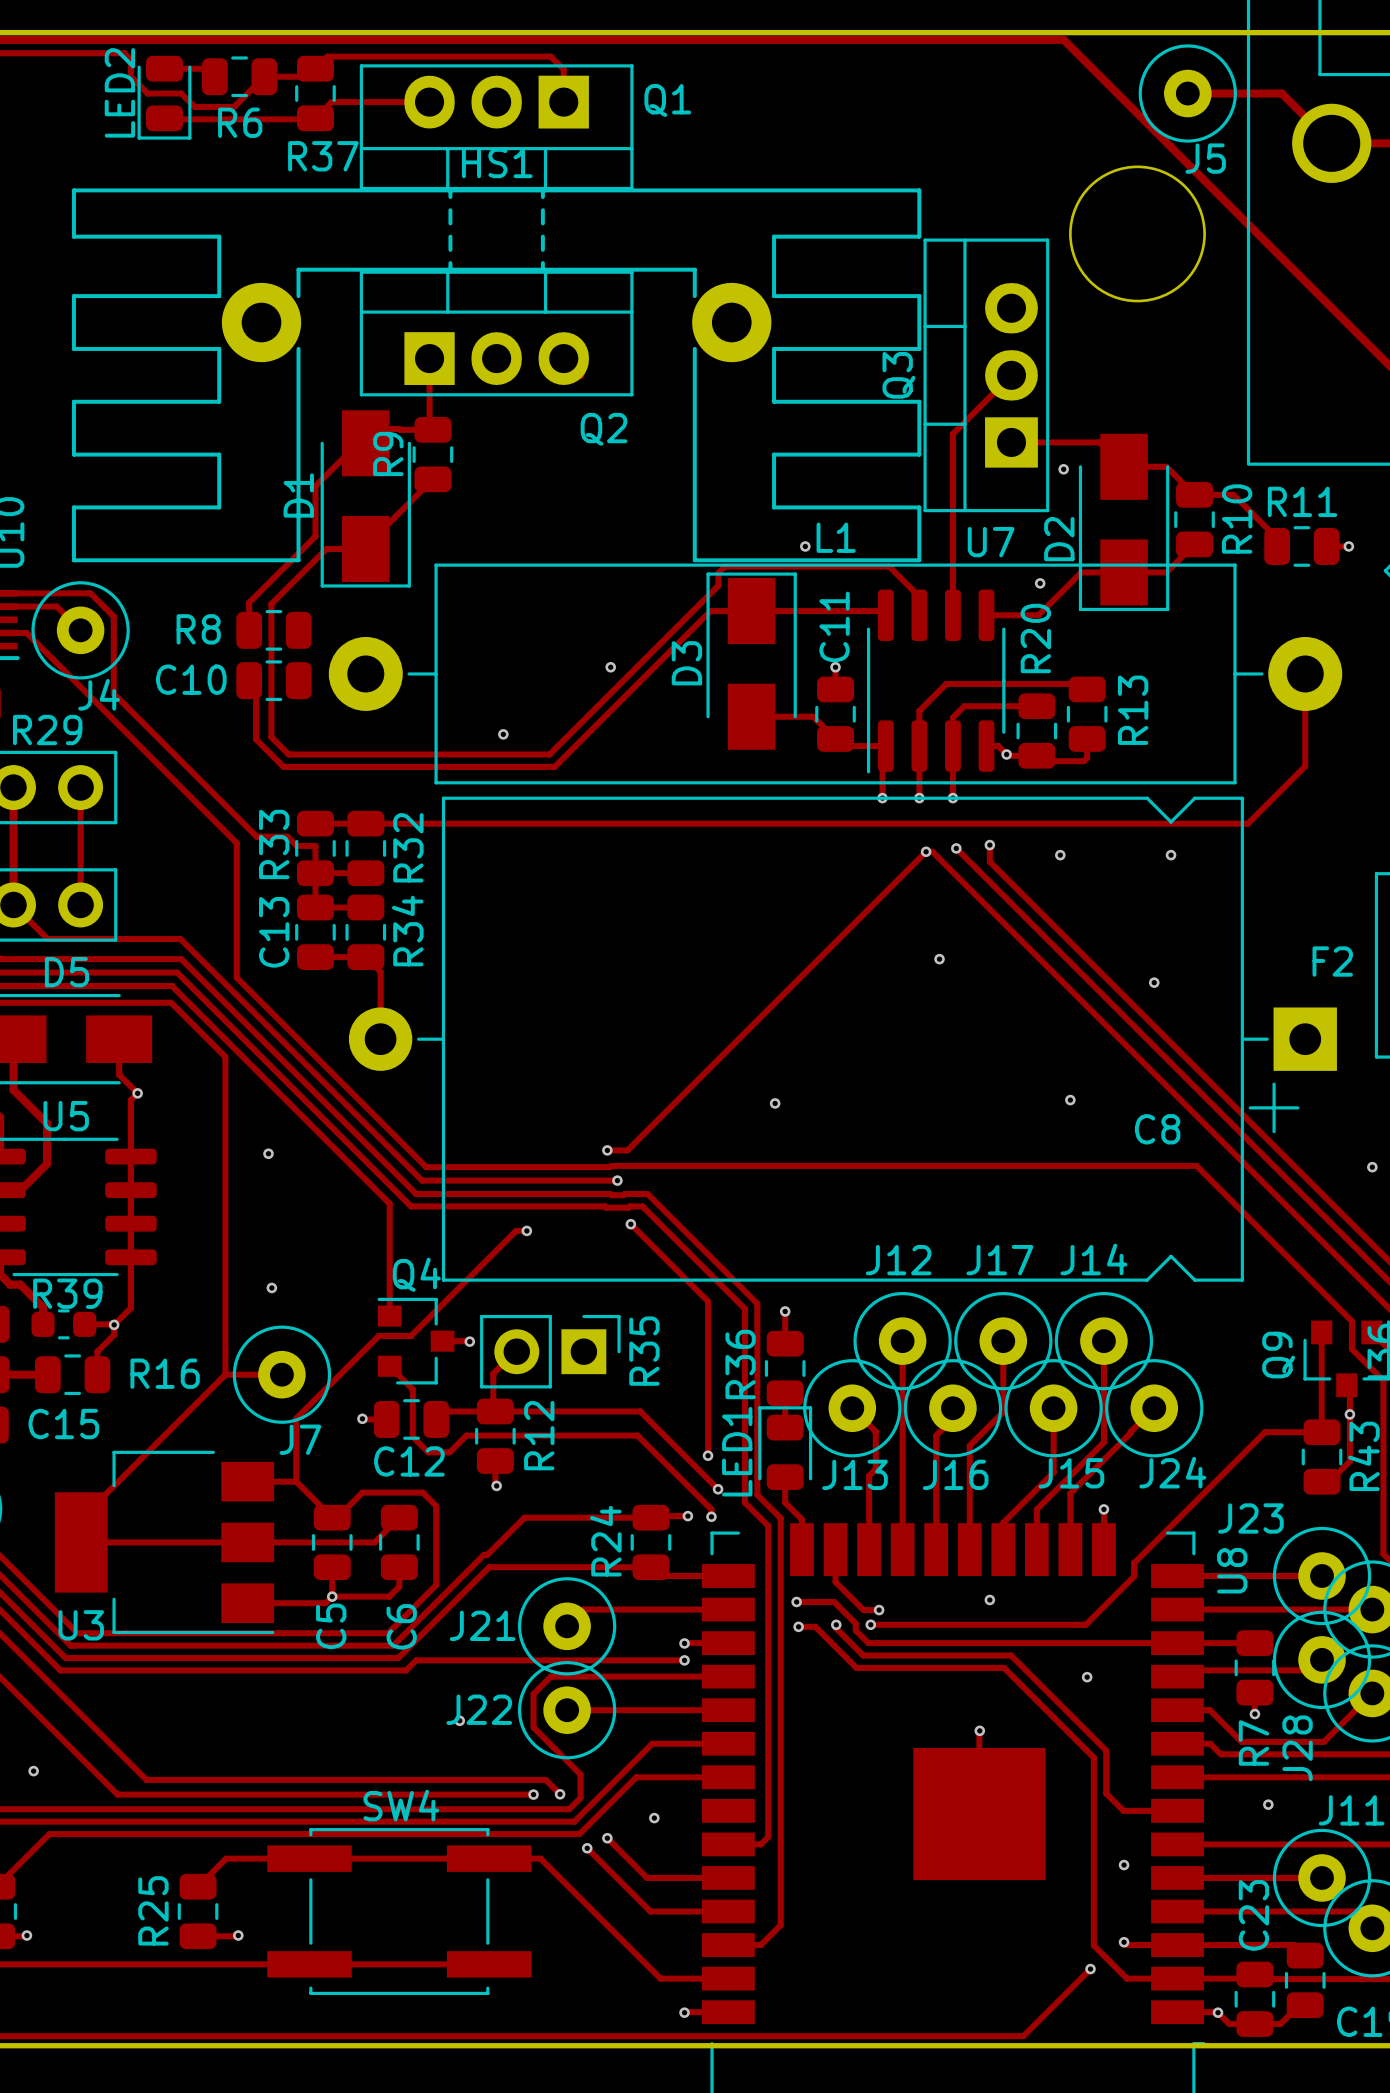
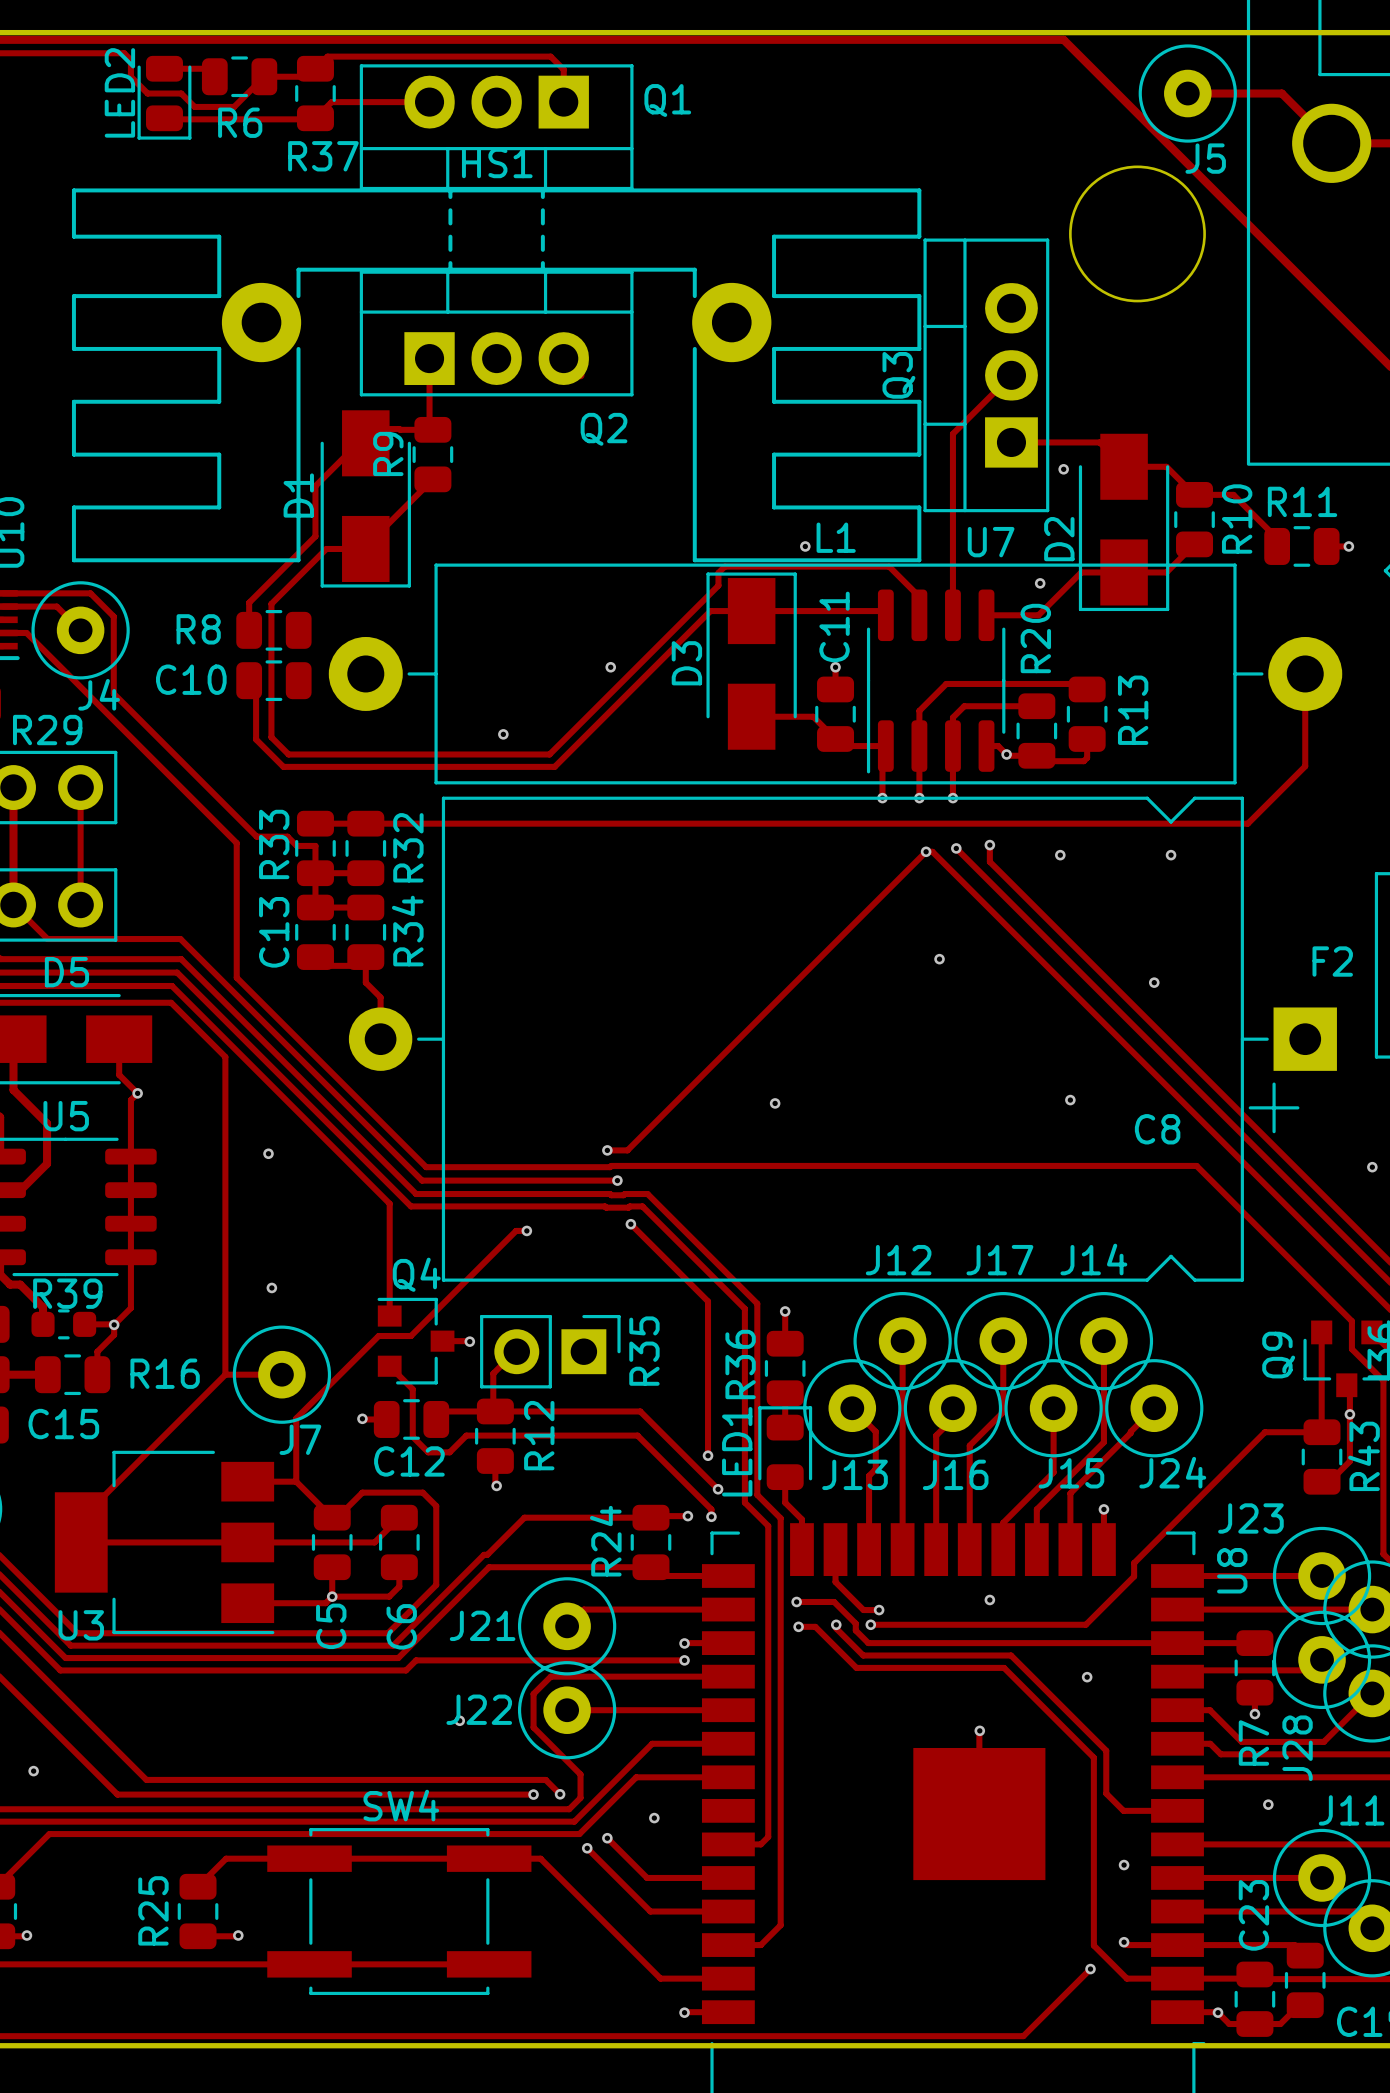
track: (315, 957) (365, 957) (380, 971) (380, 997) -> (315, 965) (365, 965) (365, 982) (380, 997)

